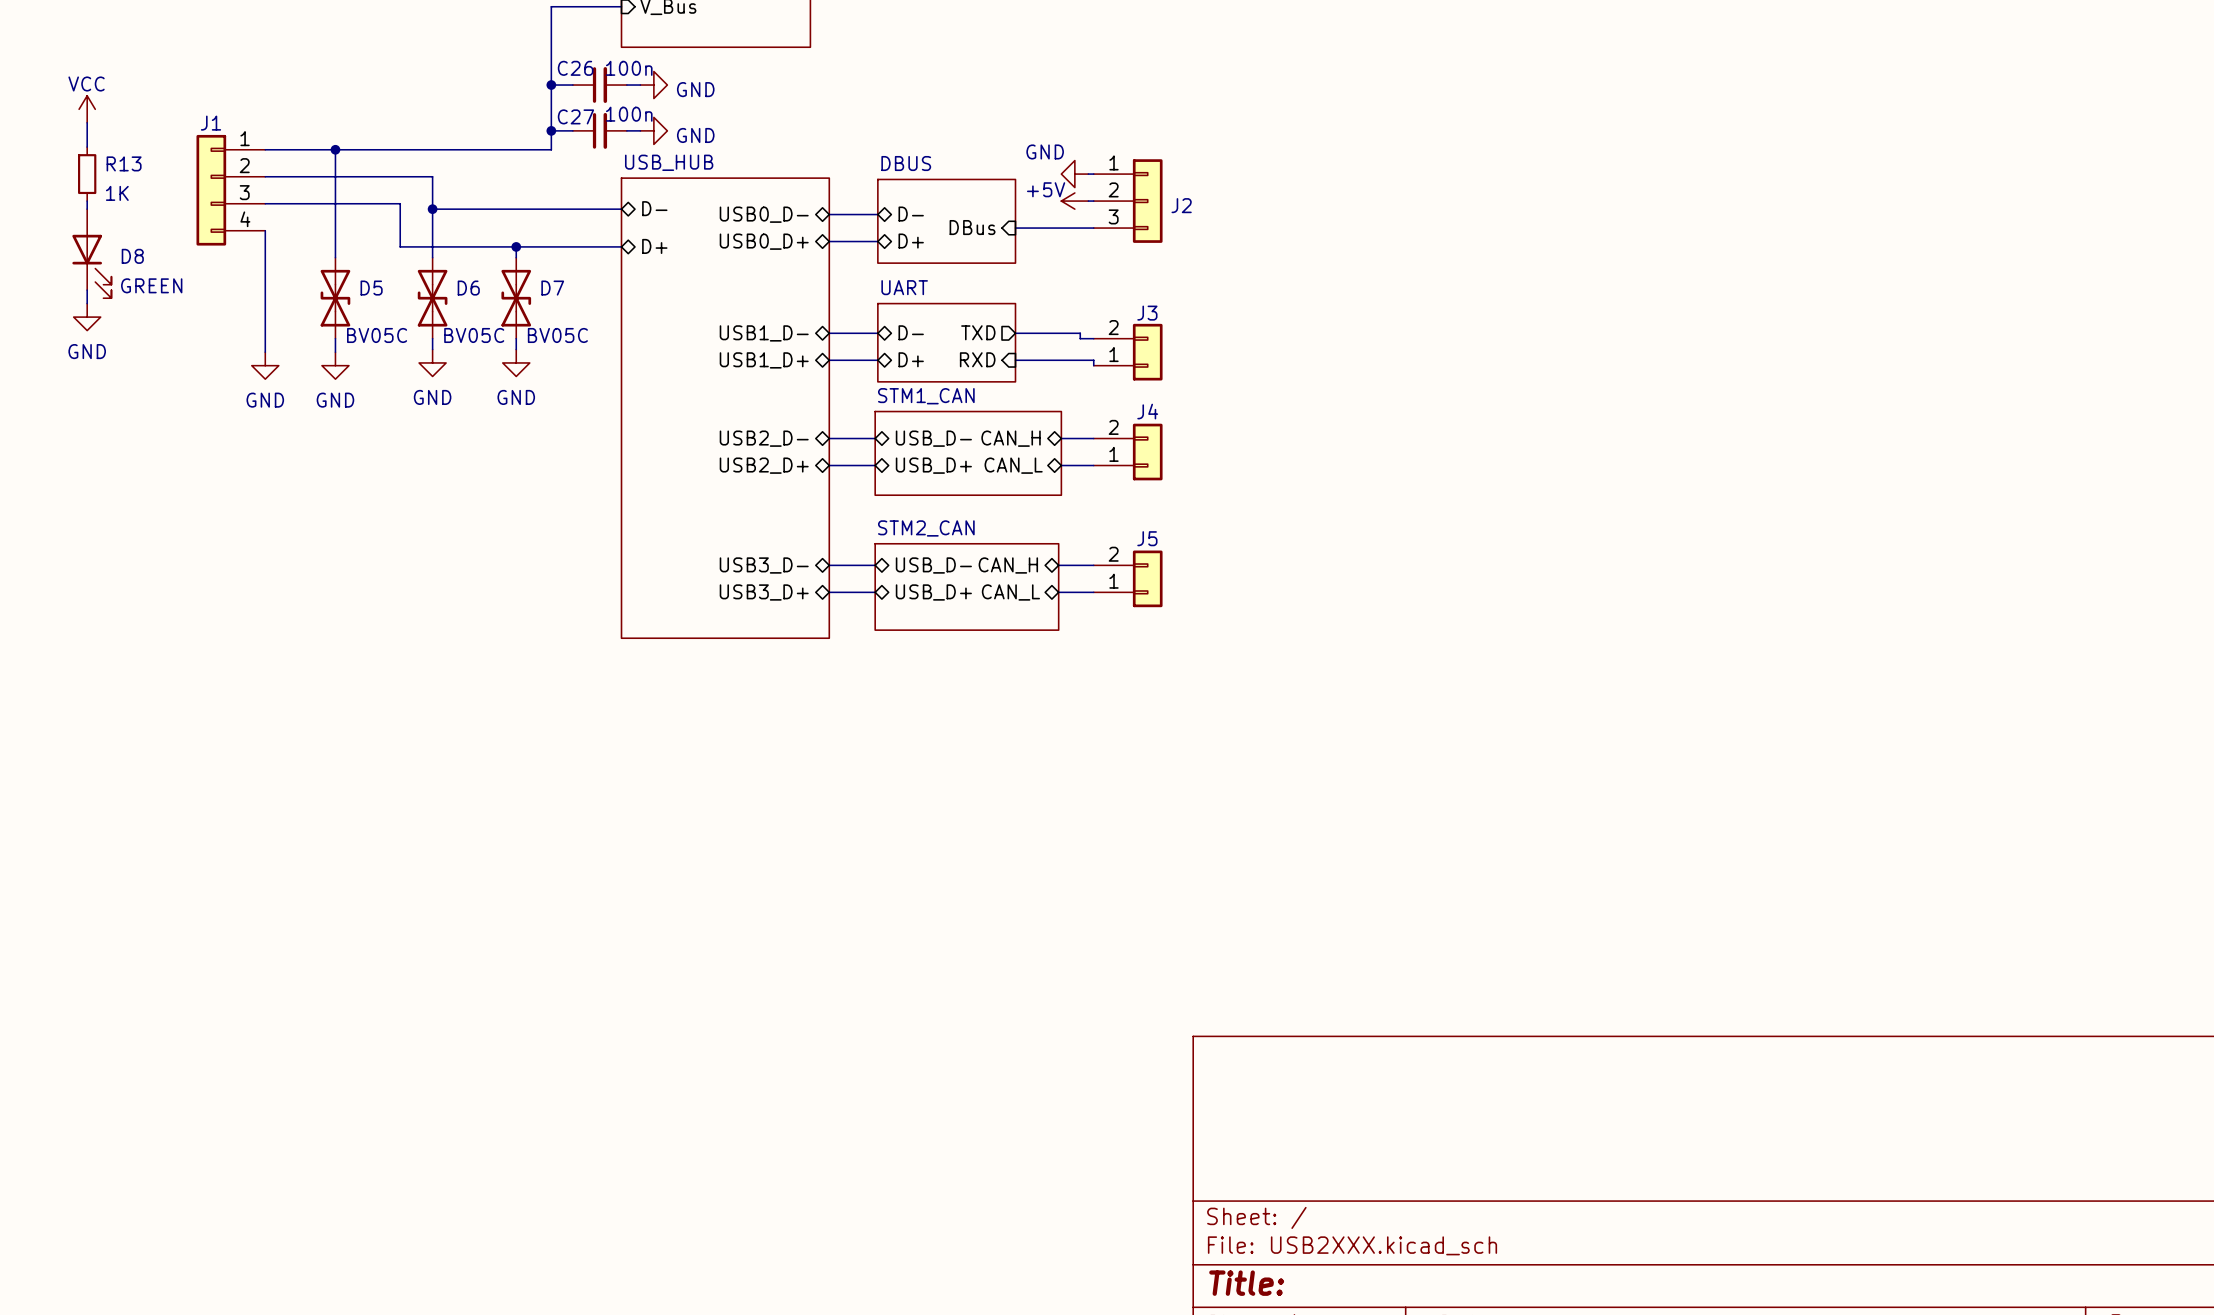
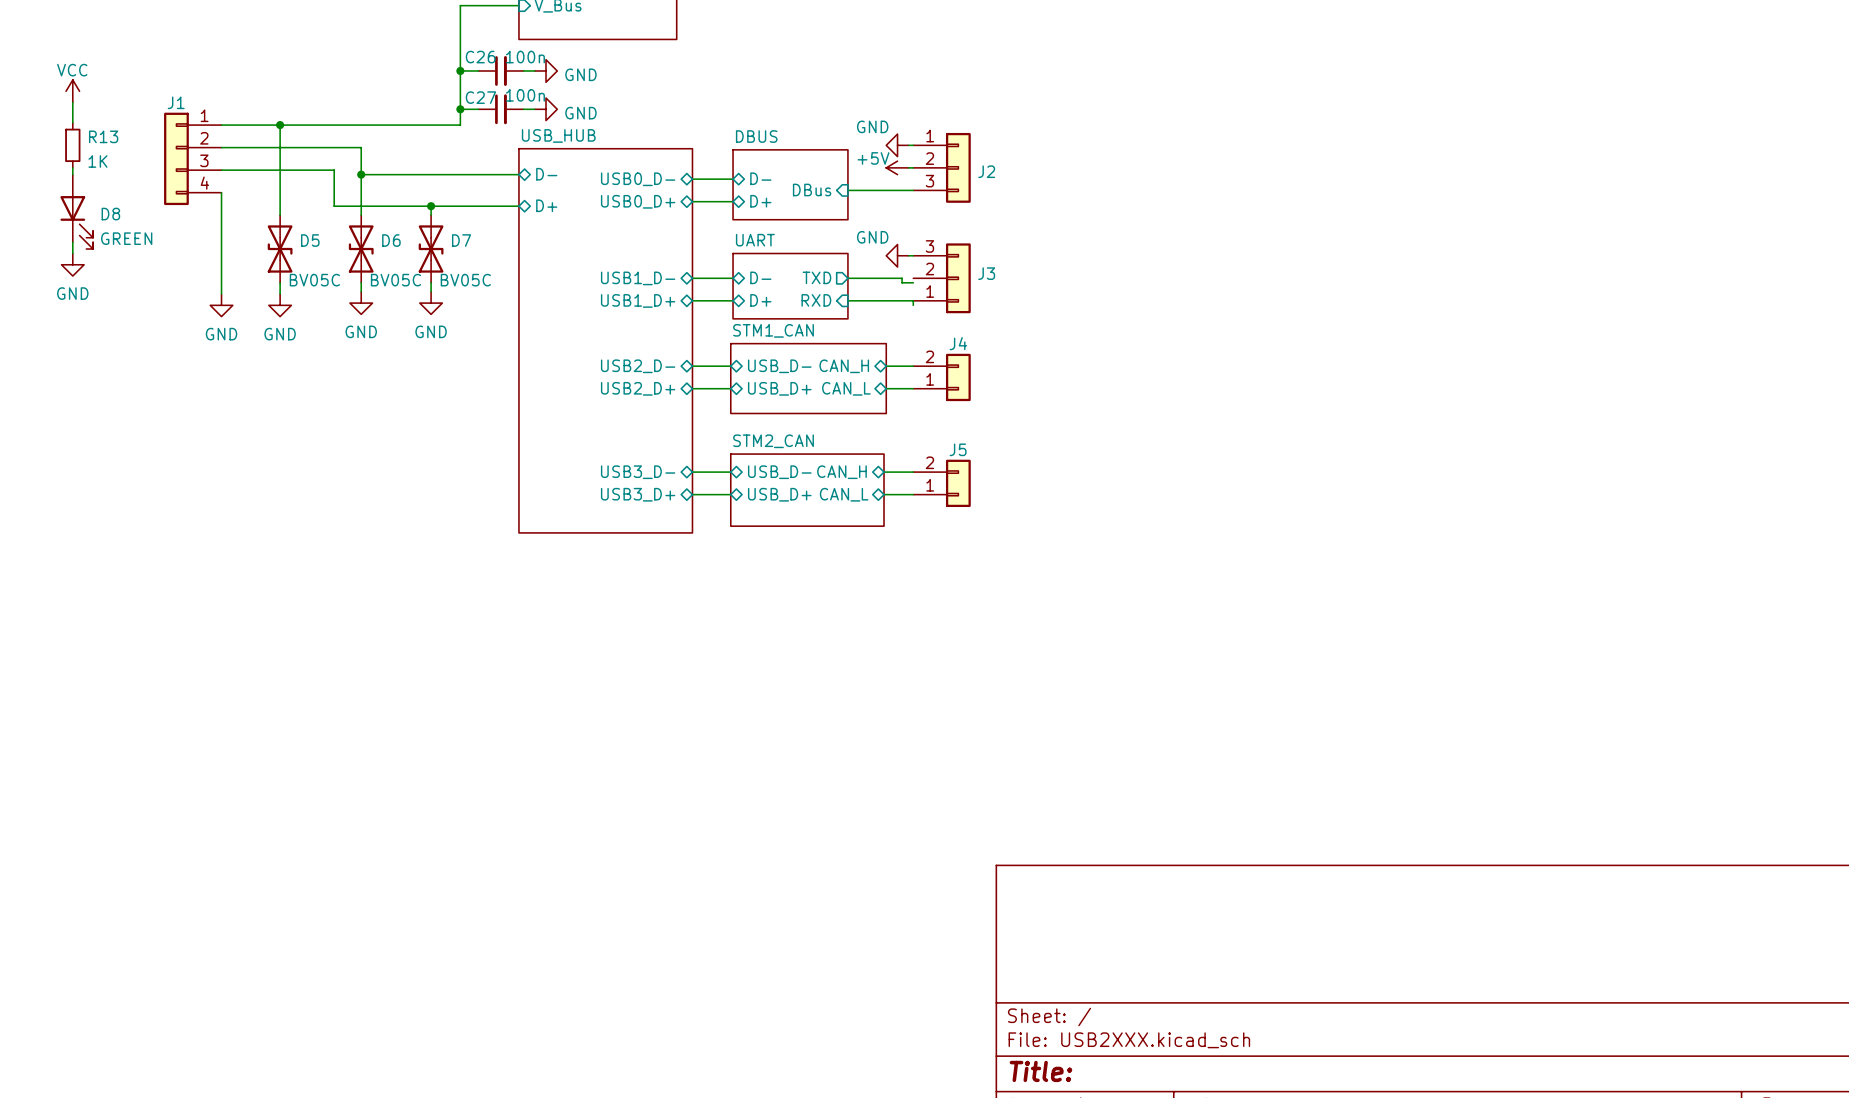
power symbol: none -> GND (897, 255)
wire: none -> (908, 255) (913, 255)
J3 name position: J3 (1147, 313) -> J3 (986, 273)
J3 symbol: [1093, 323, 1163, 381] -> [913, 243, 971, 314]

